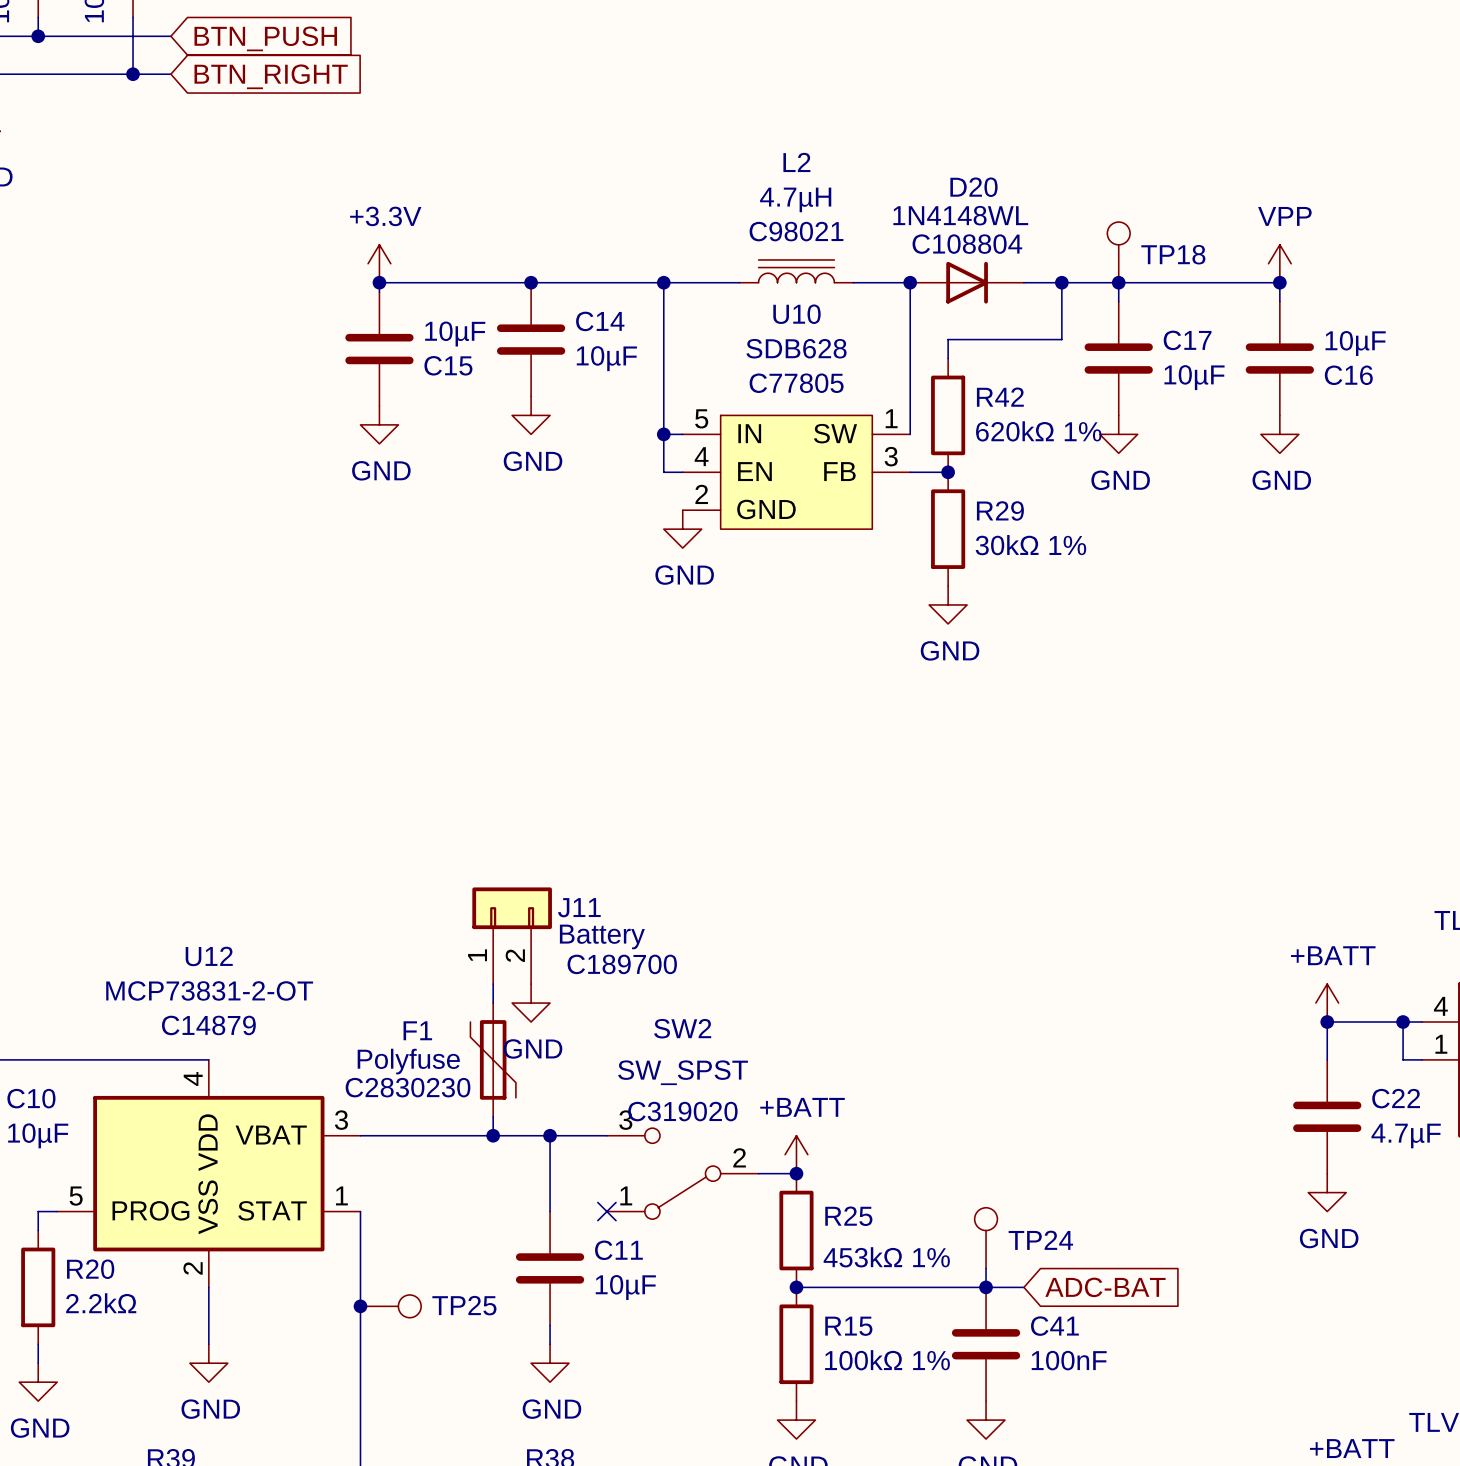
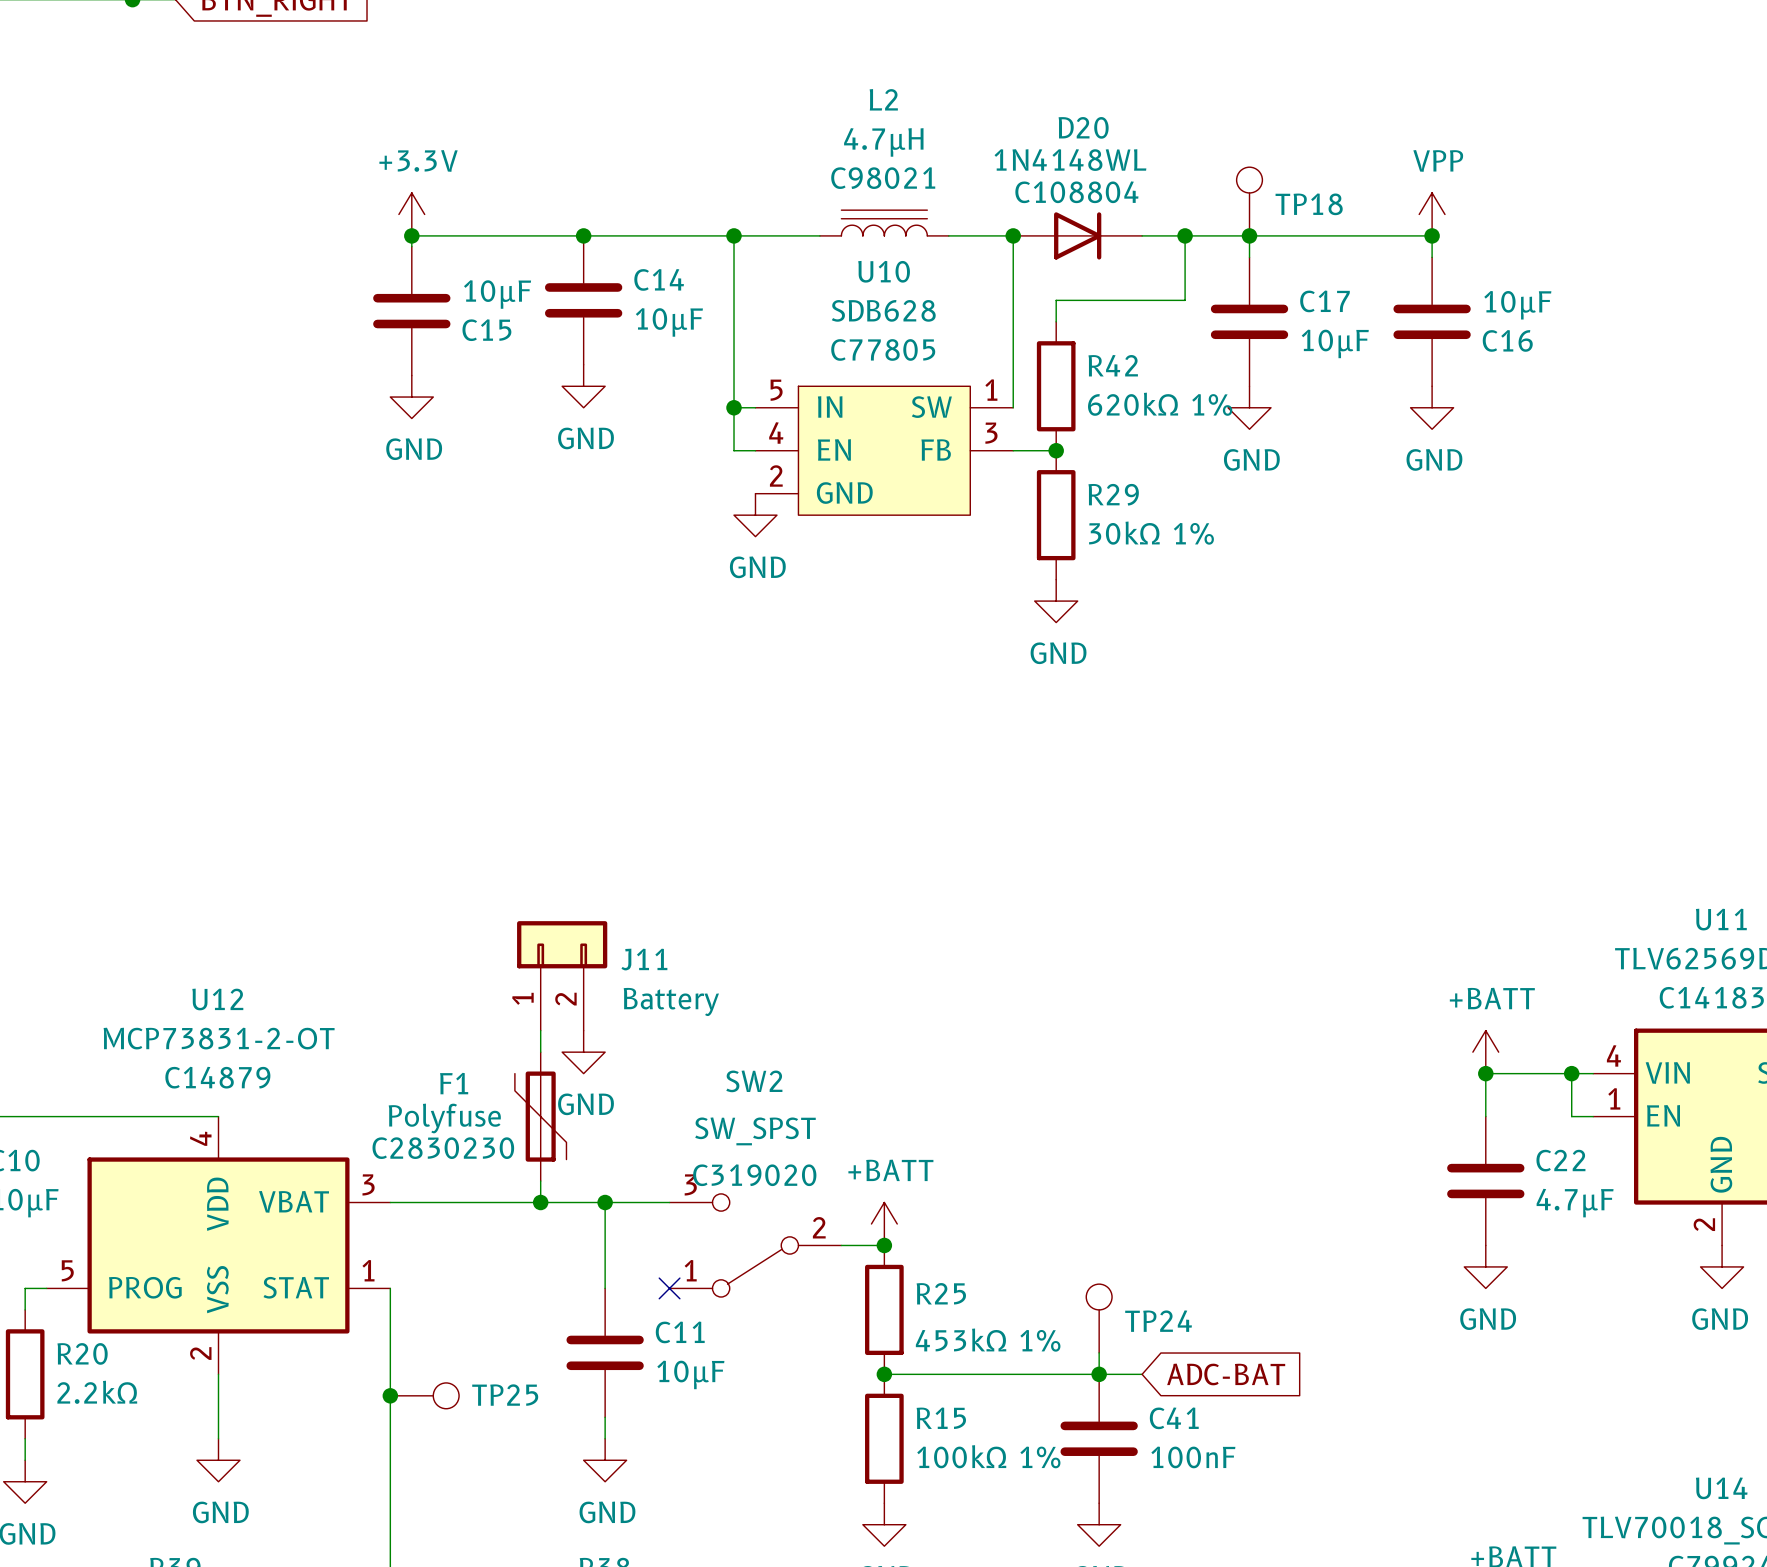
J11 name position: J11 (579, 907) -> J11 (644, 959)
J11 value position: Battery (602, 936) -> Battery (671, 1001)
J11 text: C189700 (622, 964) -> none

